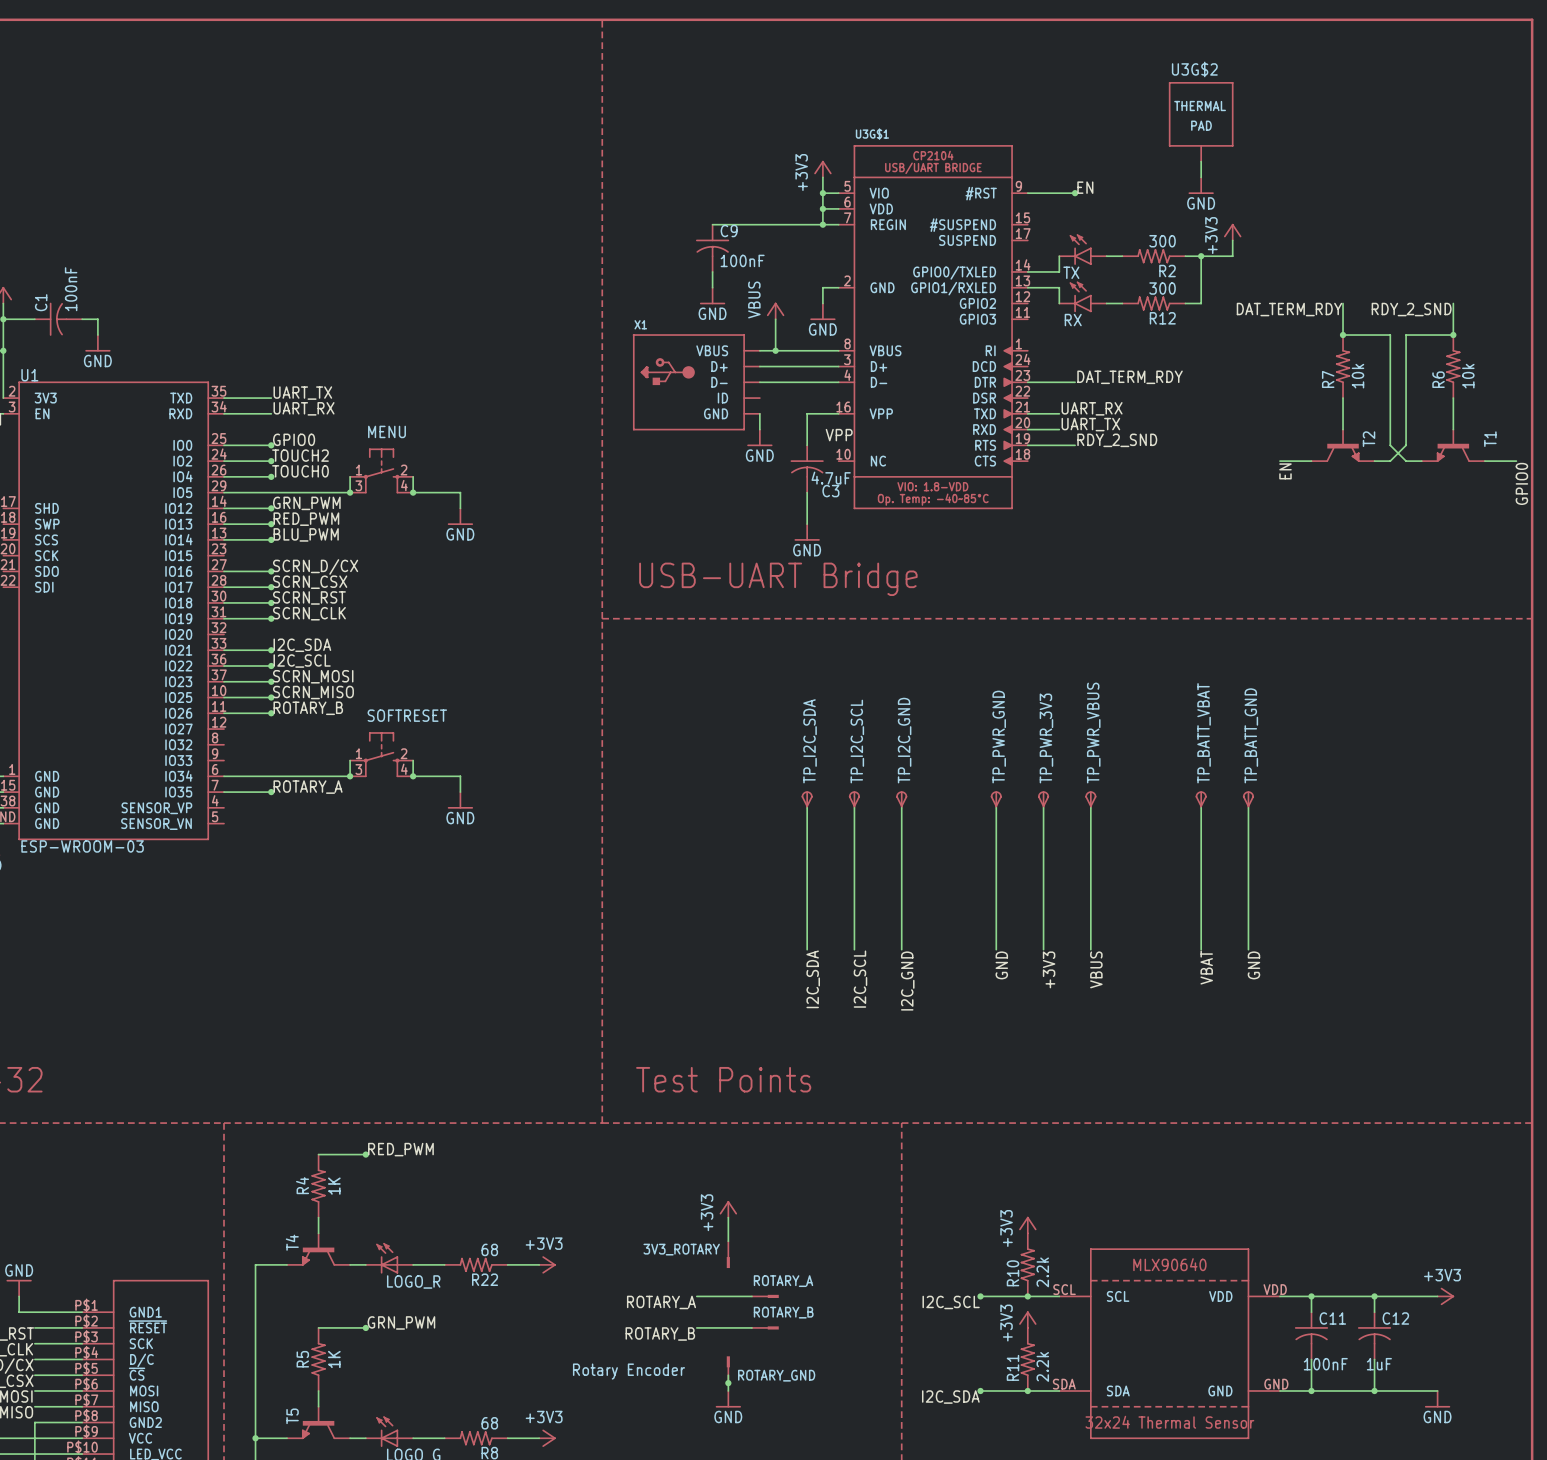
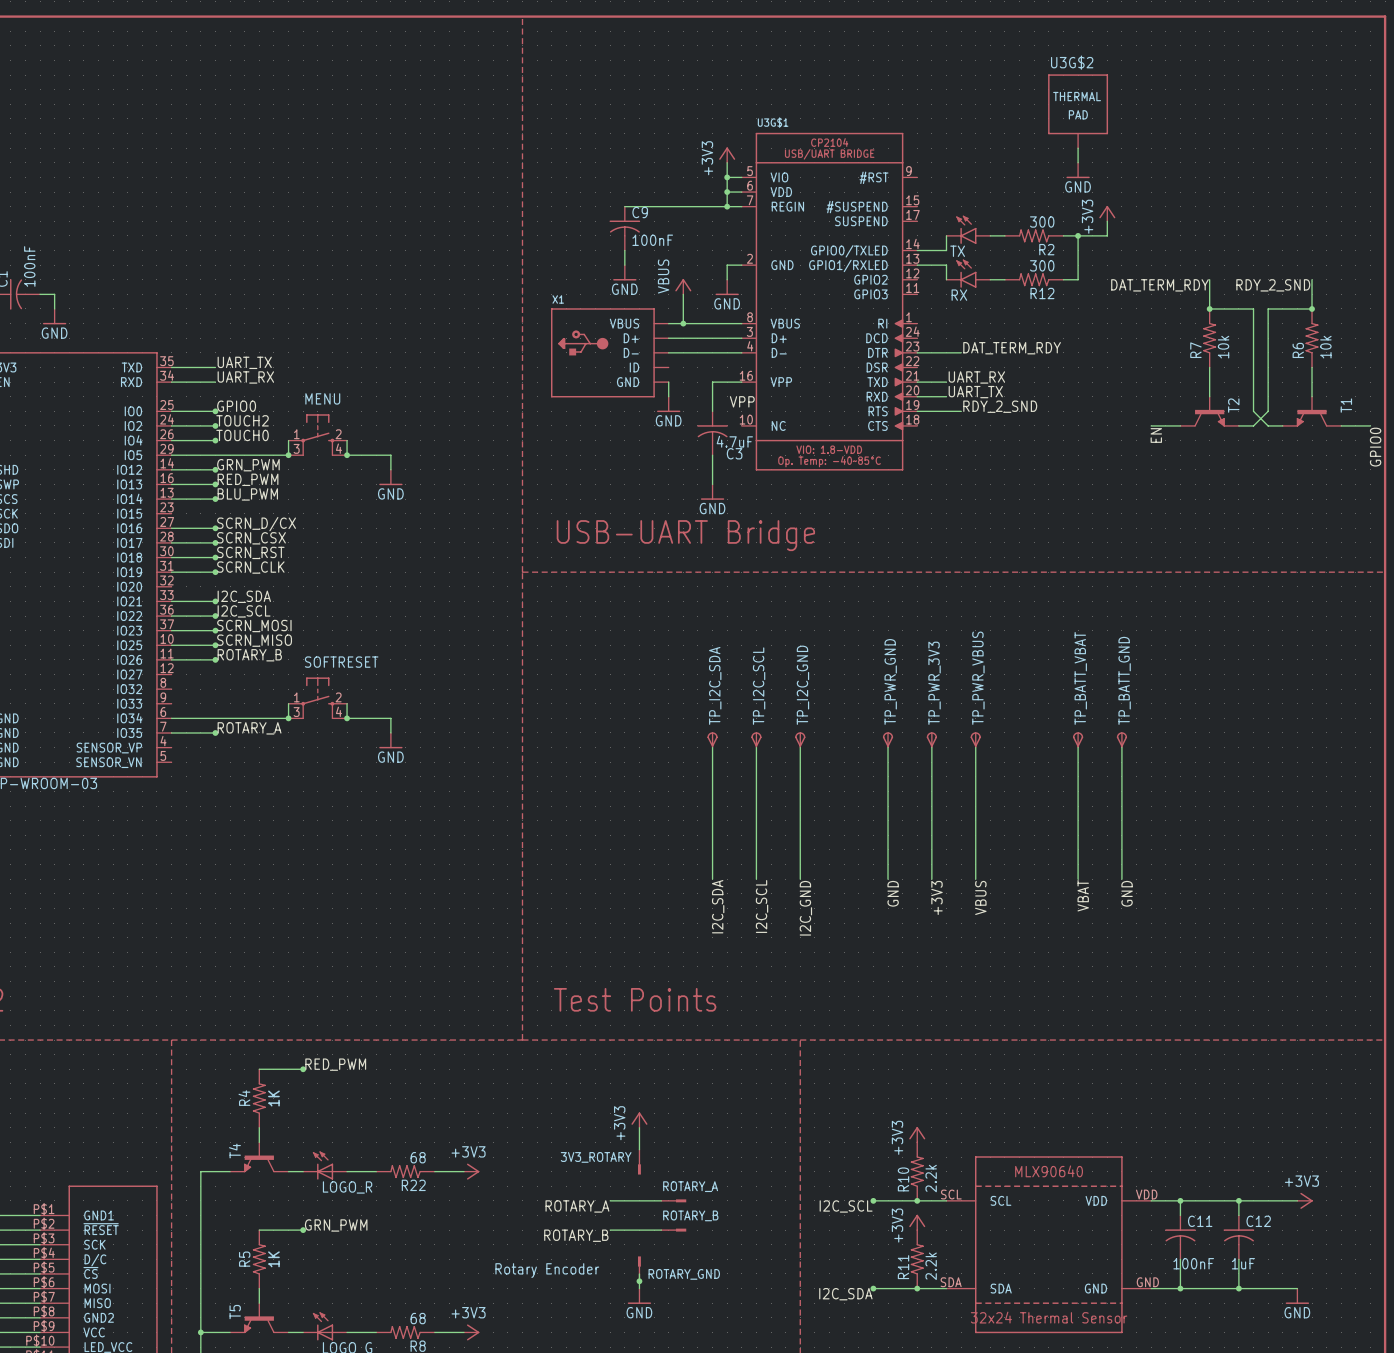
label: EN (1085, 187) -> none
wire: (1027, 193) (1075, 193) -> none
junction: (1075, 193) -> none

